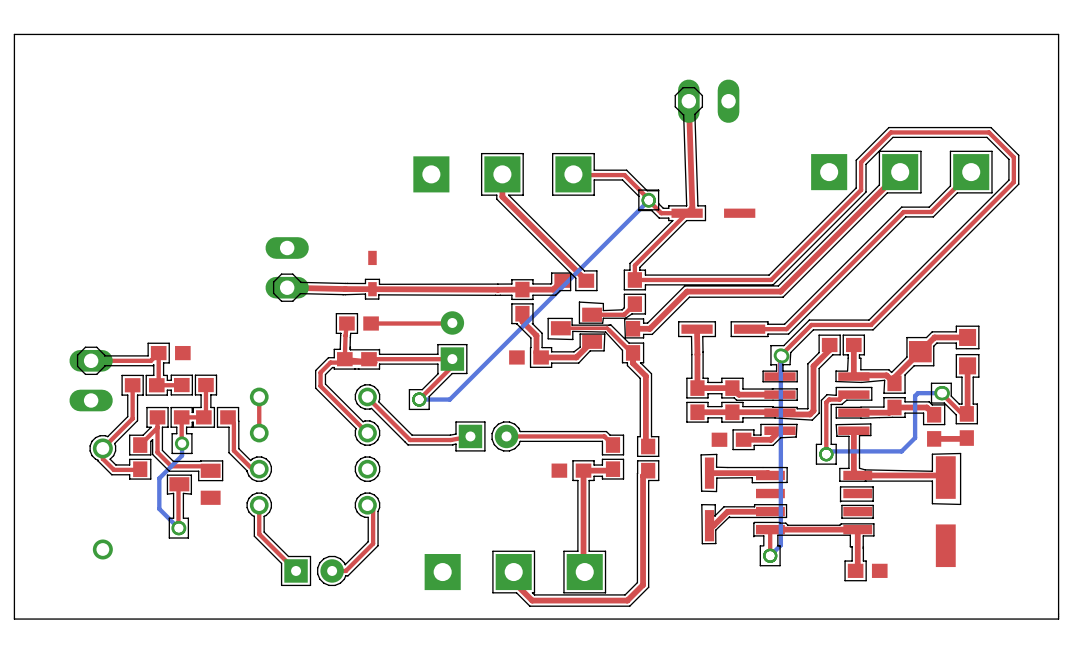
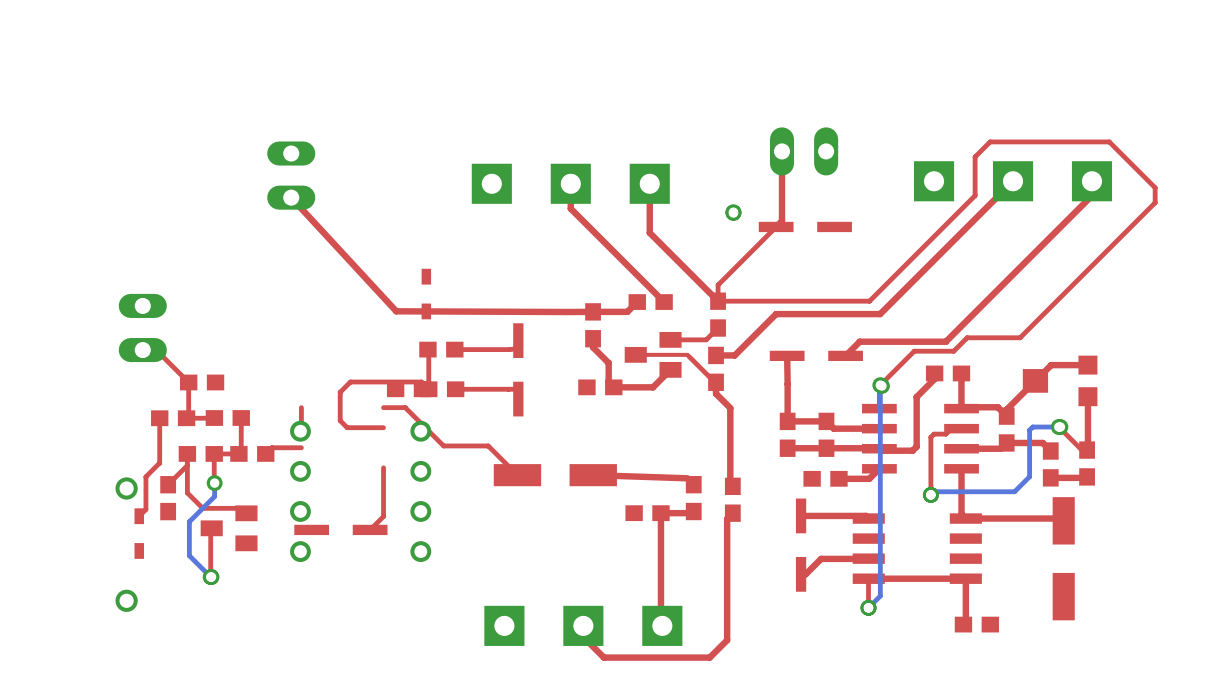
board edge: (1058, 34) (1058, 619) (14, 619) (14, 34) (1058, 34) -> none
top track: (688, 101) (692, 207) -> (782, 151) (782, 221)
part position: (708, 101) -> (804, 151)
board edge: (920, 151) (879, 151) (879, 184) (778, 285) (684, 285) (647, 323) (643, 323) (643, 318) (624, 318) (625, 337) (643, 337) (643, 334) (652, 334) (689, 297) (783, 297) (887, 192) (920, 192) (920, 151) -> none
board edge: (991, 151) (950, 151) (950, 185) (929, 207) (901, 207) (784, 324) (767, 324) (767, 321) (731, 321) (731, 336) (767, 336) (767, 334) (788, 334) (905, 216) (933, 216) (957, 192) (991, 192) (991, 151) -> none
board edge: (523, 153) (481, 153) (481, 195) (496, 195) (496, 199) (575, 278) (575, 290) (596, 290) (596, 270) (584, 270) (508, 195) (523, 195) (523, 153) -> none
part: none -> (291, 175)
top track: (971, 172) (931, 212) (903, 212) (786, 329) (749, 329) -> (1091, 181) (1091, 195) (945, 341) (859, 341) (845, 355)
top track: (573, 174) (624, 175) (661, 213) (687, 213) -> (649, 183) (649, 232) (718, 301)
board edge: (658, 190) (647, 190) (626, 170) (594, 170) (594, 153) (552, 153) (552, 195) (594, 195) (594, 179) (622, 179) (638, 196) -> none
top track: (861, 190) (861, 162) (890, 132) (988, 132) (1013, 157) (1013, 182) (871, 324) (846, 324) -> (969, 201) (975, 195) (975, 156) (990, 141) (1109, 141) (1155, 187) (1155, 202) (1020, 337) (967, 337) (953, 351)
bottom track: (648, 200) (449, 399) (419, 399) -> none
board edge: (658, 203) (663, 208) (668, 208) (668, 205) (686, 205) -> none
board edge: (697, 205) (694, 114) (702, 106) (702, 95) (694, 87) (683, 87) (675, 95) (675, 106) (683, 114) (686, 205) -> none
board edge: (698, 205) (705, 205) (705, 220) (686, 220) (639, 267) (639, 270) (645, 270) (645, 275) (769, 275) (856, 187) (856, 160) (888, 127) (991, 127) (1018, 155) (1018, 184) (873, 329) (813, 329) (790, 352) (790, 364) (782, 364) -> none
board edge: (638, 209) (658, 209) (658, 190) (638, 190) (638, 210) (651, 210) (659, 218) (668, 218) (668, 220) (672, 220) (629, 263) (629, 270) (624, 270) (624, 289) (645, 289) (645, 284) (773, 284) (866, 192) (866, 164) (892, 137) (986, 137) (1008, 159) (1008, 180) (869, 320) (809, 320) (783, 345) (770, 345) (770, 365) -> none
part: (287, 267) -> none
board edge: (347, 283) (365, 283) (365, 279) (379, 279) (379, 284) (511, 284) (511, 279) (532, 279) (532, 283) (551, 283) (551, 273) (570, 273) (570, 290) (560, 290) (555, 295) (532, 295) (532, 299) (511, 299) (511, 295) (378, 294) (378, 299) (365, 299) (365, 294) (343, 294) -> none
board edge: (347, 283) (300, 282) (292, 274) (281, 274) (273, 282) (273, 293) (281, 301) (292, 301) (300, 293) (343, 294) -> none
top track: (287, 287) (345, 289) -> (291, 197) (396, 311)
board edge: (645, 294) (624, 294) (624, 307) (622, 309) (603, 310) (603, 303) (579, 302) (579, 323) (602, 323) (603, 318) (625, 318) (631, 313) (645, 313) (645, 294) -> none
board edge: (532, 303) (511, 303) (511, 323) (516, 323) (530, 337) (530, 367) (551, 367) (551, 363) (578, 363) (590, 350) (604, 350) (604, 334) (580, 334) (580, 347) (574, 351) (551, 351) (551, 347) (542, 347) (542, 333) (532, 323) (532, 303) -> none
part footprint: [440, 311, 465, 371] -> [513, 323, 524, 417]
board edge: (572, 318) (548, 318) (548, 338) (572, 339) (572, 331) (605, 332) (622, 350) (622, 362) (627, 362) (627, 365) (640, 378) (640, 436) (637, 436) (637, 456) (658, 456) (658, 436) (651, 436) (651, 373) (640, 362) (643, 362) (643, 343) (629, 343) (610, 325) (572, 325) (572, 318) -> none
top track: (346, 323) (344, 359) (375, 362) (330, 362) (320, 372) (320, 386) (367, 433) -> none
part: (359, 323) -> none
top track: none -> (427, 349) (428, 389) (421, 382) (350, 382) (340, 392) (340, 420) (347, 427) (383, 427)
part: none -> (441, 349)
top track: (398, 323) (371, 323) -> none
board edge: (350, 337) (350, 333) (357, 333) (357, 313) (336, 313) (336, 333) (340, 333) (340, 349) (334, 349) (334, 357) (328, 357) (315, 370) (315, 388) (356, 428) (357, 439) (360, 443) (369, 445) (377, 439) (379, 435) (377, 426) (369, 420) (363, 421) (325, 384) (325, 374) (332, 367) (355, 369) -> none
board edge: (350, 337) (350, 349) -> none
board edge: (169, 343) (148, 343) (148, 355) (104, 355) (96, 347) (85, 347) (77, 355) (77, 366) (85, 374) (96, 374) (104, 365) (153, 364) (153, 375) (146, 375) (146, 395) (167, 395) (167, 390) (171, 390) (171, 394) (192, 394) (192, 375) (171, 375) (171, 380) (167, 380) (167, 375) (163, 375) (163, 362) (169, 362) (169, 343) -> none
board edge: (350, 346) (350, 349) (379, 349) -> none
board edge: (379, 349) (379, 354) (437, 354) (437, 344) (466, 344) (466, 373) (452, 373) (429, 396) (429, 409) (409, 409) (409, 389) (422, 389) (438, 373) (437, 364) (379, 364) (379, 369) (358, 369) -> none
board edge: (703, 352) (703, 378) (708, 378) (708, 382) (721, 382) (721, 378) (742, 378) (742, 389) (773, 389) -> none
board edge: (703, 352) (702, 336) (715, 336) (715, 321) (678, 321) (678, 336) (691, 336) (691, 378) (686, 378) (686, 397) (708, 397) (708, 393) (721, 393) (721, 397) (734, 397) (736, 400) (797, 400) (797, 388) (772, 388) -> none
top track: (158, 353) (150, 360) (91, 360) -> (188, 382) (156, 350) (142, 350)
board edge: (978, 354) (978, 377) (973, 377) (973, 404) (977, 404) (977, 423) (956, 423) (956, 414) (944, 403) (931, 403) (931, 383) (951, 383) (951, 396) (959, 404) (961, 404) (961, 377) (956, 377) (956, 354) (978, 354) -> none
part: none -> (442, 389)
top track: (398, 359) (368, 359) -> none
top track: (452, 359) (452, 366) (419, 399) -> none
board edge: (782, 364) (782, 371) (797, 371) (797, 381) (763, 381) (763, 371) (776, 371) (776, 364) (770, 364) -> none
board edge: (358, 369) (354, 369) -> none
board edge: (836, 370) (836, 381) (861, 382) (884, 380) (883, 393) (905, 393) (905, 374) (914, 365) (933, 365) (933, 346) (936, 343) (956, 343) (956, 348) (978, 348) (978, 326) (956, 326) (956, 331) (932, 331) (926, 337) (906, 337) (906, 357) (891, 372) (888, 369) (860, 369) (859, 354) (864, 354) (864, 335) (843, 335) (843, 354) (848, 354) (847, 371) -> none
board edge: (846, 371) (836, 371) -> none
board edge: (143, 375) (122, 375) (122, 395) (127, 395) (127, 416) (107, 436) (100, 435) (95, 437) (90, 445) (92, 455) (111, 474) (129, 474) (129, 479) (150, 479) (150, 459) (129, 459) (129, 464) (115, 464) (110, 459) (115, 450) (114, 443) (137, 420) (137, 395) (143, 395) (143, 375) -> none
board edge: (216, 375) (195, 375) (195, 394) (201, 394) (201, 407) (193, 407) (193, 412) (192, 407) (171, 407) (171, 427) (176, 427) (176, 433) (172, 433) (172, 453) (191, 453) (191, 433) (186, 433) (186, 427) (192, 427) (192, 422) (193, 427) (214, 427) (214, 407) (210, 407) (210, 394) (216, 394) (216, 375) -> none
top track: none -> (301, 407) (301, 427)
top track: none -> (383, 407) (405, 407) (443, 445) (488, 445) (517, 475)
part position: (91, 380) -> (142, 327)
board edge: (369, 384) (360, 386) (357, 390) (355, 394) (357, 403) (365, 409) (371, 408) (408, 444) (456, 444) (456, 450) (484, 450) (484, 421) (456, 421) (456, 434) (450, 435) (412, 435) (378, 401) (379, 394) (377, 390) (369, 384) -> none
board edge: (836, 395) (836, 387) (871, 387) (871, 400) -> none
board edge: (836, 395) (827, 394) (821, 400) (821, 444) (816, 444) (816, 464) (836, 464) (836, 444) (831, 444) (831, 404) (841, 404) (846, 400) (871, 400) -> none
top track: (259, 396) (259, 433) -> none
top track: (367, 396) (410, 440) (450, 440) (470, 436) -> none
via: (419, 399) -> none
board edge: (773, 406) (742, 406) (742, 402) (721, 402) (721, 406) (708, 406) (708, 402) (686, 402) (686, 422) (708, 422) (708, 417) (721, 417) (721, 422) (742, 422) (742, 417) (775, 417) -> none
board edge: (773, 406) (807, 408) -> none
board edge: (168, 407) (146, 407) (146, 427) (151, 427) (143, 435) (129, 435) (129, 454) (150, 454) (150, 441) (152, 439) (152, 454) (169, 471) (198, 471) (198, 480) (222, 480) (222, 460) (173, 461) (162, 450) (162, 427) (168, 427) (168, 407) -> none
board edge: (238, 407) (217, 407) (217, 427) (229, 427) (229, 452) (247, 470) (252, 479) (261, 481) (269, 475) (271, 466) (266, 458) (261, 457) (250, 460) (238, 448) (238, 407) -> none
board edge: (860, 407) (883, 407) (883, 397) (905, 397) (905, 401) (929, 401) (932, 404) (944, 404) (944, 424) (923, 424) (923, 413) (905, 413) (905, 417) (860, 418) -> none
board edge: (861, 407) (836, 407) (836, 418) (861, 418) -> none
board edge: (807, 408) (807, 363) (819, 352) (819, 335) (840, 335) (840, 354) (832, 354) (819, 368) (819, 413) (812, 420) (774, 417) -> none
top track: (228, 417) (233, 423) (233, 450) (252, 469) (259, 469) -> (265, 453) (271, 447) (301, 447)
top track: (132, 418) (102, 448) (102, 458) (113, 469) (140, 469) -> (159, 455) (159, 462) (145, 476) (145, 509) (139, 516)
part footprint: [458, 424, 519, 449] -> [493, 464, 617, 487]
board edge: (796, 424) (796, 437) (780, 437) (773, 445) (754, 445) (754, 449) (733, 449) (733, 429) (754, 429) -> none
board edge: (797, 424) (760, 424) (760, 435) (753, 435) (753, 430) -> none
top track: none -> (383, 467) (383, 516) (370, 529)
top track: (506, 436) (604, 436) (607, 439) -> (593, 475) (687, 478)
board edge: (602, 441) (520, 441) (514, 448) (503, 450) (494, 444) (492, 433) (498, 424) (503, 421) (514, 424) (520, 431) (606, 431) (610, 435) (623, 435) (623, 454) (602, 454) (602, 441) -> none
board edge: (716, 454) (716, 467) (787, 467) (787, 482) (752, 482) (752, 477) (716, 478) (716, 491) (701, 491) (701, 454) (716, 454) -> none
board edge: (369, 457) (360, 458) (355, 466) (357, 475) (365, 481) (374, 479) (379, 471) (377, 462) (369, 457) -> none
board edge: (623, 459) (602, 459) (602, 465) (594, 465) (594, 460) (572, 460) (572, 480) (577, 480) (577, 551) (563, 551) (563, 592) (605, 592) (605, 551) (589, 551) (589, 480) (594, 480) (594, 476) (602, 476) (602, 479) (623, 479) (623, 459) -> none
board edge: (848, 468) (848, 436) (836, 436) (836, 424) (870, 423) (870, 435) (859, 435) (859, 468) (865, 469) (932, 471) (932, 454) (960, 453) (960, 504) (932, 503) (932, 481) (865, 481) -> none
board edge: (849, 468) (839, 468) (839, 481) (866, 481) -> none
board edge: (637, 473) (637, 460) (658, 460) (658, 480) (648, 480) (648, 587) (629, 606) (529, 606) (516, 592) (492, 592) (492, 551) (534, 551) (534, 592) (532, 592) (534, 594) (625, 594) (637, 582) (637, 473) -> none
board edge: (191, 475) (167, 475) (167, 494) (173, 493) (173, 518) (169, 518) (169, 538) (188, 538) (188, 518) (183, 518) (183, 493) (191, 494) (191, 475) -> none
part: none -> (340, 529)
part: none -> (139, 533)
board edge: (261, 493) (252, 494) (247, 502) (248, 512) (254, 516) (254, 536) (281, 563) (281, 585) (310, 585) (310, 556) (288, 556) (264, 532) (264, 516) (269, 512) (271, 502) (269, 498) (261, 493) -> none
board edge: (369, 493) (360, 494) (355, 502) (357, 512) (360, 515) (368, 517) (368, 541) (345, 564) (340, 558) (335, 556) (323, 558) (317, 568) (317, 573) (323, 583) (329, 585) (340, 583) (378, 545) (379, 502) (377, 498) (369, 493) -> none
board edge: (840, 501) (873, 501) (873, 486) (840, 486) (840, 501) -> none
top track: (259, 505) (259, 534) (296, 570) -> none
top track: (367, 505) (373, 510) (373, 543) (345, 570) (332, 570) -> none
board edge: (873, 505) (873, 518) (841, 518) (841, 505) (873, 505) -> none
board edge: (714, 516) (724, 506) (786, 504) (786, 517) (729, 517) -> none
board edge: (715, 516) (715, 504) (701, 504) (702, 543) (715, 543) (715, 530) (729, 516) -> none
board edge: (763, 545) (763, 535) (753, 536) (754, 522) (779, 522) (787, 525) (873, 523) (873, 535) (863, 535) (863, 548) -> none
board edge: (763, 545) (760, 545) (760, 565) (780, 565) (777, 535) (850, 535) (852, 561) (845, 561) (845, 580) (866, 580) (866, 561) (863, 561) (863, 546) -> none
part: (314, 570) -> none

